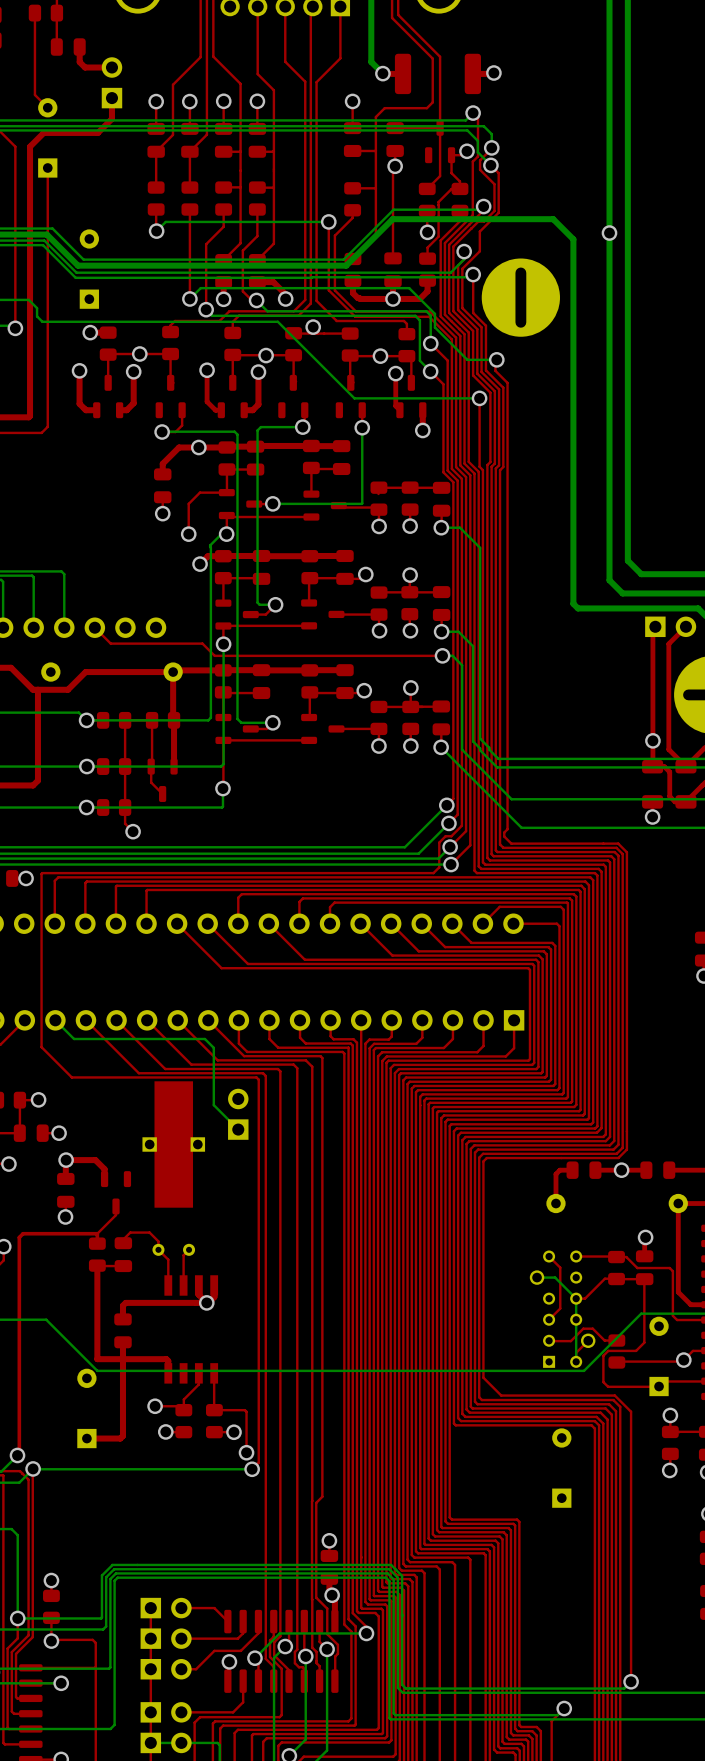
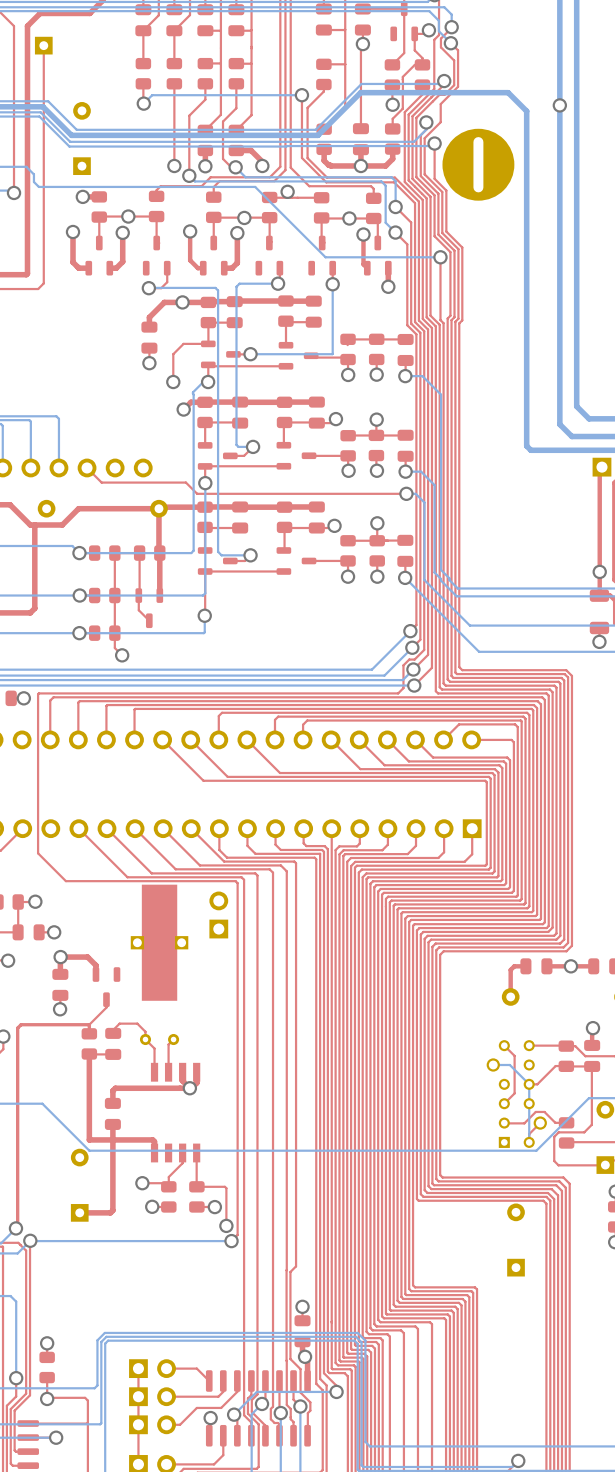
bottom track: (189, 298) (200, 288) (409, 288) (434, 313) (434, 327) (467, 359) (496, 359) -> none
top track: (496, 359) (495, 370) (507, 382) (507, 829) (504, 832) (504, 836) (511, 843) (618, 843) (626, 852) (626, 1149) (618, 1158) (486, 1158) (483, 1161) (483, 1377) (501, 1395) (614, 1395) (631, 1411) (631, 1681) -> none
via: (496, 359) -> none
bottom track: (55, 1020) (74, 1039) (204, 1039) (213, 1047) (213, 1105) (238, 1129) -> none
bottom track: (17, 1618) (101, 1618) (101, 1575) (112, 1564) (391, 1564) (402, 1575) (402, 1684) (405, 1688) (624, 1688) (631, 1681) -> none
via: (631, 1681) -> none

